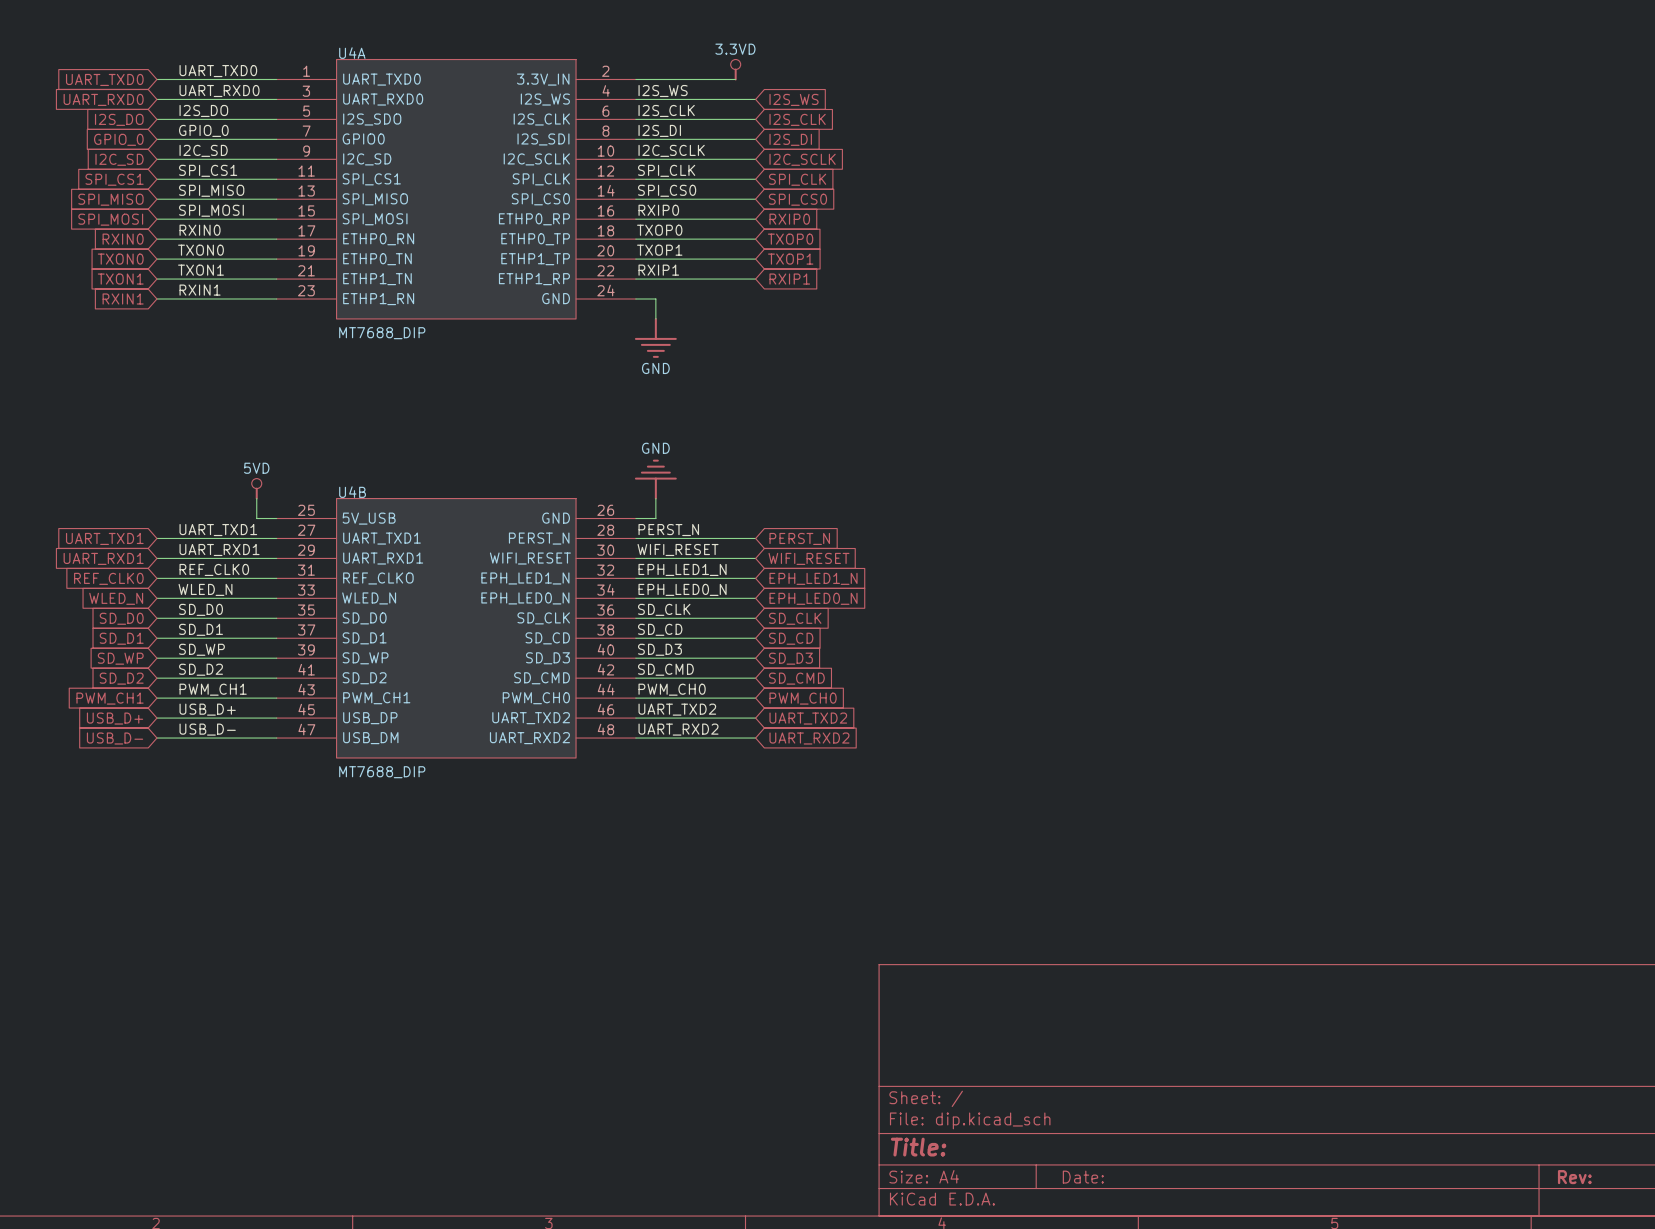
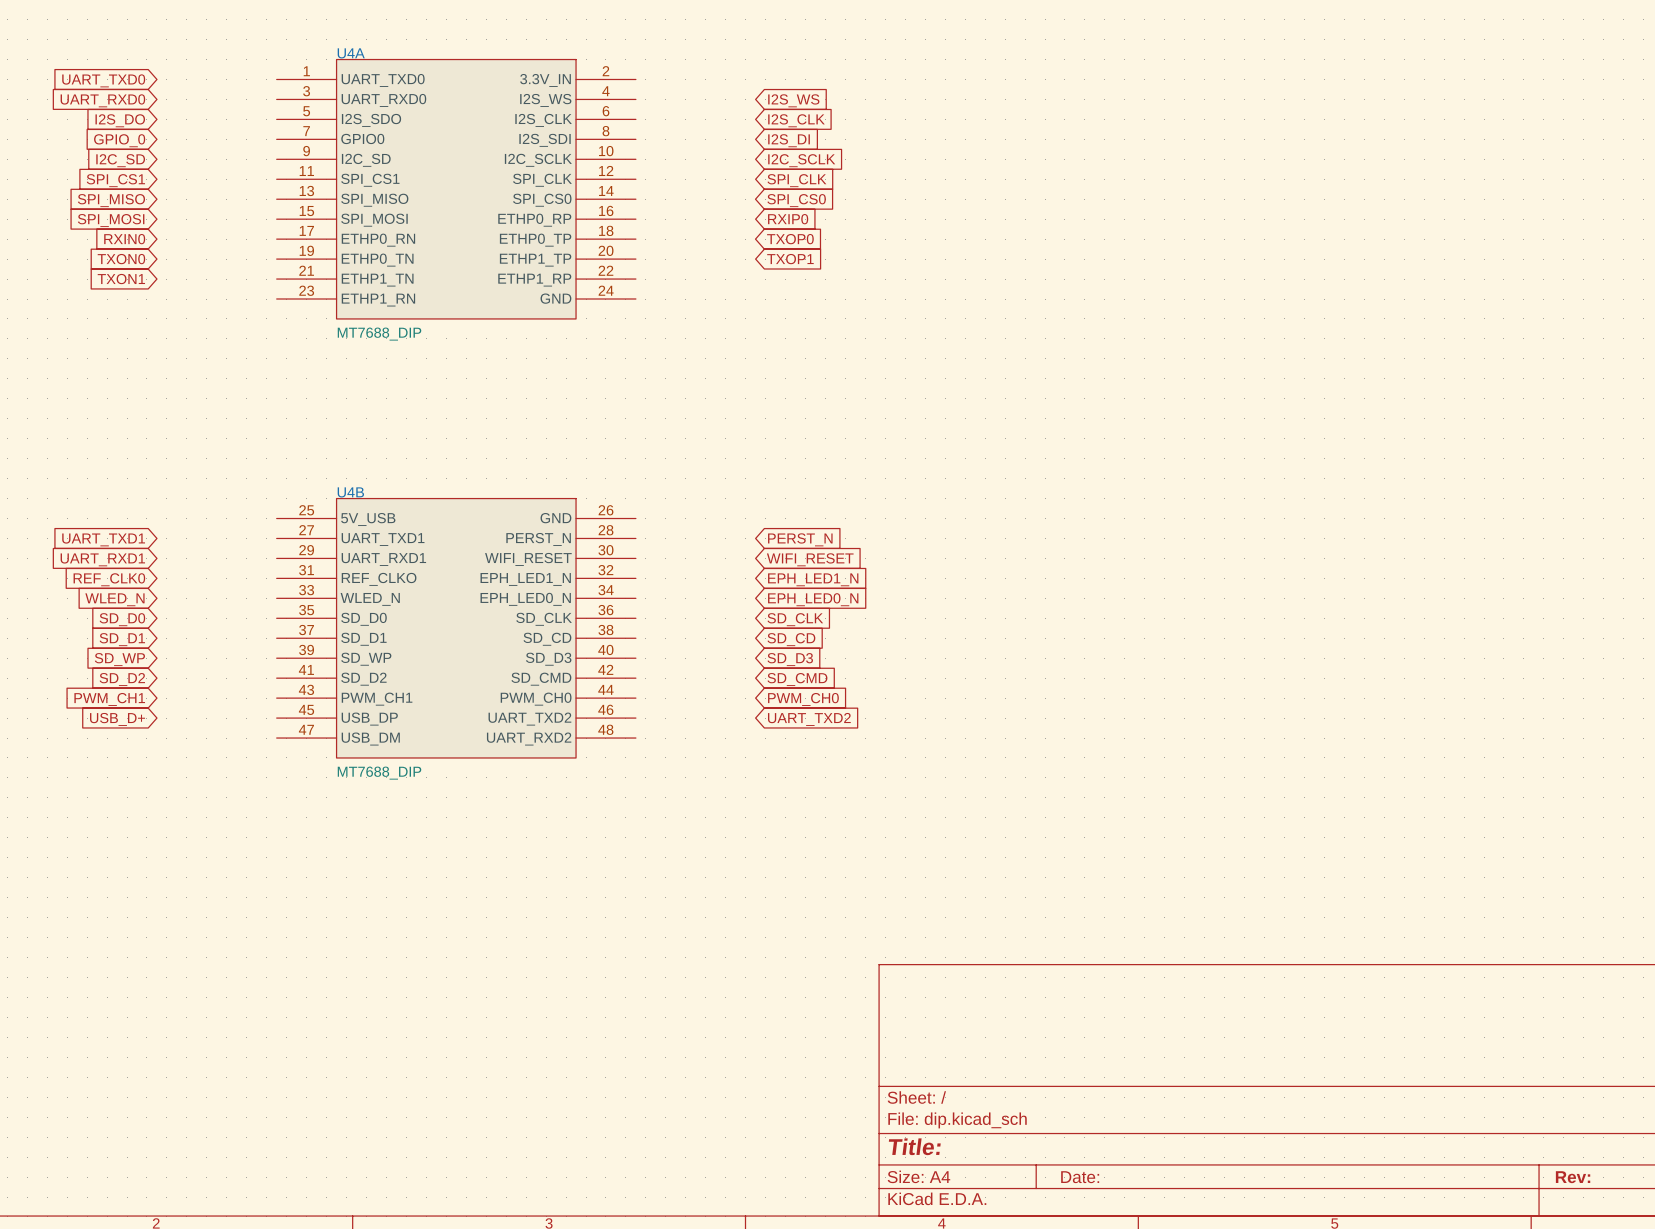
power symbol: 3.3VD (735, 69) -> none
label: UART_TXD0 (218, 71) -> none
wire: (156, 79) (276, 79) -> none
wire: (635, 79) (735, 79) -> none
label: UART_RXD0 (219, 91) -> none
label: I2S_WS (663, 91) -> none
wire: (156, 99) (276, 99) -> none
wire: (635, 99) (755, 99) -> none
label: I2S_DO (203, 110) -> none
label: I2S_CLK (666, 110) -> none
wire: (156, 119) (276, 119) -> none
wire: (635, 119) (755, 119) -> none
label: GPIO_0 (203, 130) -> none
label: I2S_DI (659, 130) -> none
wire: (156, 139) (276, 139) -> none
wire: (635, 139) (755, 139) -> none
label: I2C_SD (203, 150) -> none
label: I2C_SCLK (671, 150) -> none
wire: (156, 159) (276, 159) -> none
wire: (635, 159) (755, 159) -> none
label: SPI_CS1 (208, 170) -> none
label: SPI_CLK (666, 170) -> none
wire: (156, 179) (276, 179) -> none
wire: (635, 179) (755, 179) -> none
label: SPI_MISO (211, 190) -> none
label: SPI_CS0 (667, 190) -> none
wire: (156, 199) (276, 199) -> none
wire: (635, 199) (755, 199) -> none
label: SPI_MOSI (211, 210) -> none
label: RXIP0 (658, 210) -> none
wire: (156, 219) (276, 219) -> none
wire: (635, 219) (755, 219) -> none
label: RXIN0 (200, 230) -> none
label: TXOP0 (659, 230) -> none
wire: (156, 239) (276, 239) -> none
wire: (635, 239) (755, 239) -> none
label: TXON0 (200, 250) -> none
label: TXOP1 (659, 250) -> none
wire: (156, 259) (276, 259) -> none
wire: (635, 259) (755, 259) -> none
label: TXON1 (200, 270) -> none
label: RXIP1 (658, 270) -> none
wire: (156, 279) (276, 279) -> none
wire: (635, 279) (755, 279) -> none
global label: RXIP1 (789, 279) -> none
label: RXIN1 (200, 290) -> none
global label: RXIN1 (123, 299) -> none
wire: (156, 299) (276, 299) -> none
wire: (635, 299) (655, 299) (655, 318) -> none
power symbol: GND (655, 337) -> none
power symbol: GND (655, 479) -> none
power symbol: 5VD (256, 488) -> none
wire: (256, 498) (256, 518) (276, 518) -> none
wire: (655, 498) (655, 518) (635, 518) -> none
label: UART_TXD1 (218, 530) -> none
label: PERST_N (668, 530) -> none
wire: (156, 538) (276, 538) -> none
wire: (635, 538) (755, 538) -> none
label: UART_RXD1 (219, 549) -> none
label: WIFI_RESET (678, 549) -> none
wire: (156, 558) (276, 558) -> none
wire: (635, 558) (755, 558) -> none
label: REF_CLK0 (214, 569) -> none
label: EPH_LED1_N (682, 569) -> none
wire: (156, 578) (276, 578) -> none
wire: (635, 578) (755, 578) -> none
label: WLED_N (205, 589) -> none
label: EPH_LED0_N (682, 589) -> none
wire: (156, 598) (276, 598) -> none
wire: (635, 598) (755, 598) -> none
label: SD_D0 (200, 609) -> none
label: SD_CLK (664, 609) -> none
wire: (156, 618) (276, 618) -> none
wire: (635, 618) (755, 618) -> none
label: SD_D1 (200, 629) -> none
label: SD_CD (660, 629) -> none
wire: (156, 638) (276, 638) -> none
wire: (635, 638) (755, 638) -> none
label: SD_WP (201, 649) -> none
label: SD_D3 (659, 649) -> none
wire: (156, 658) (276, 658) -> none
wire: (635, 658) (755, 658) -> none
label: SD_D2 (200, 669) -> none
label: SD_CMD (665, 669) -> none
wire: (156, 678) (276, 678) -> none
wire: (635, 678) (755, 678) -> none
label: PWM_CH1 (213, 689) -> none
label: PWM_CH0 (672, 689) -> none
wire: (156, 698) (276, 698) -> none
wire: (635, 698) (755, 698) -> none
label: USB_D+ (207, 709) -> none
label: UART_TXD2 (677, 709) -> none
wire: (156, 718) (276, 718) -> none
wire: (635, 718) (755, 718) -> none
label: USB_D- (207, 729) -> none
label: UART_RXD2 (678, 729) -> none
global label: USB_D- (115, 738) -> none
wire: (156, 738) (276, 738) -> none
wire: (635, 738) (755, 738) -> none
global label: UART_RXD2 (809, 738) -> none

